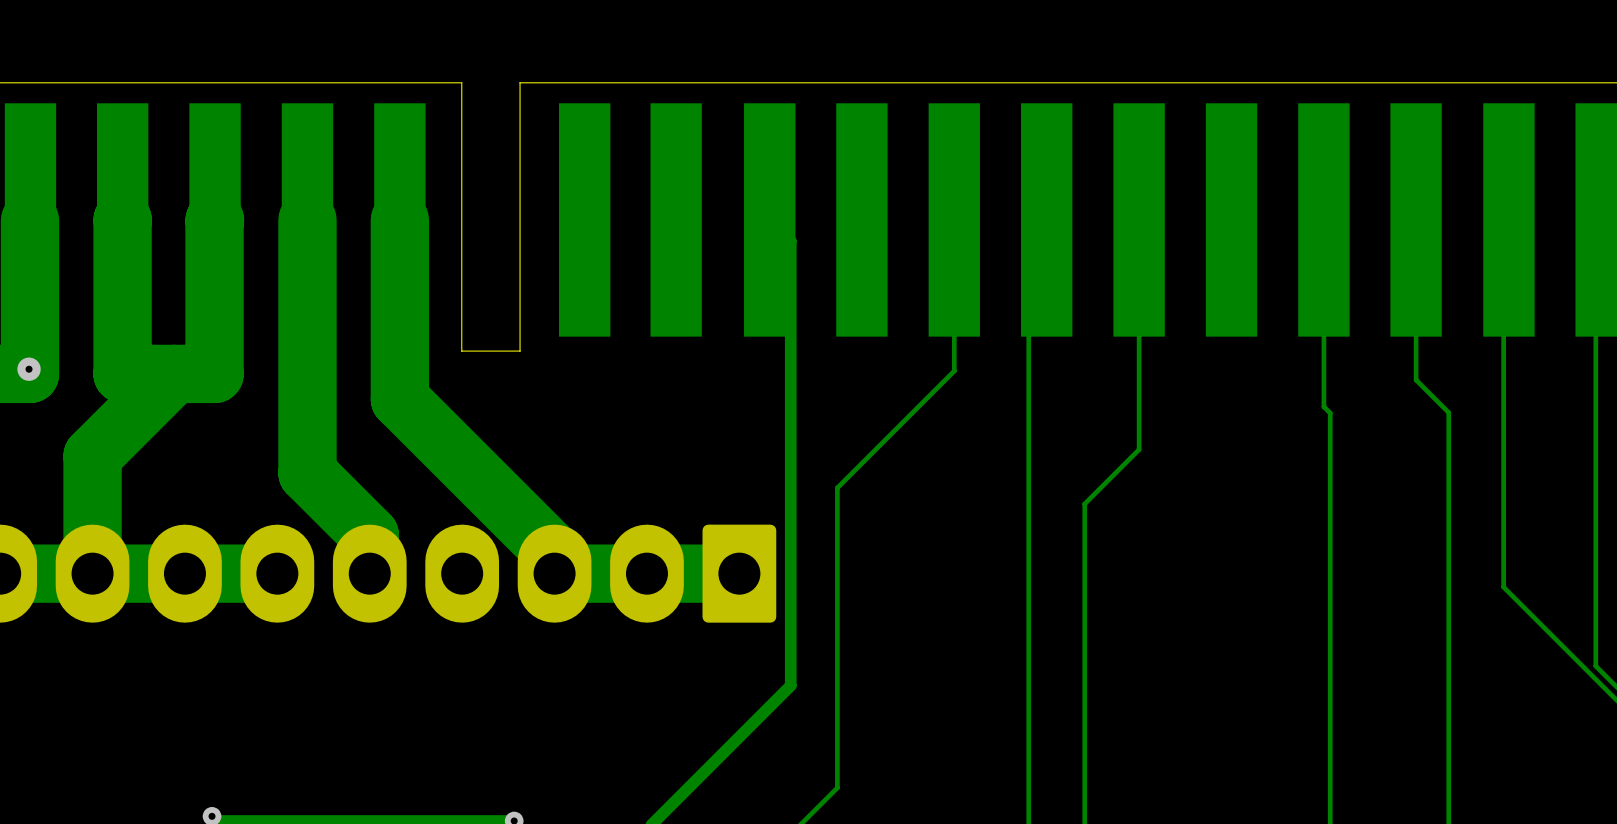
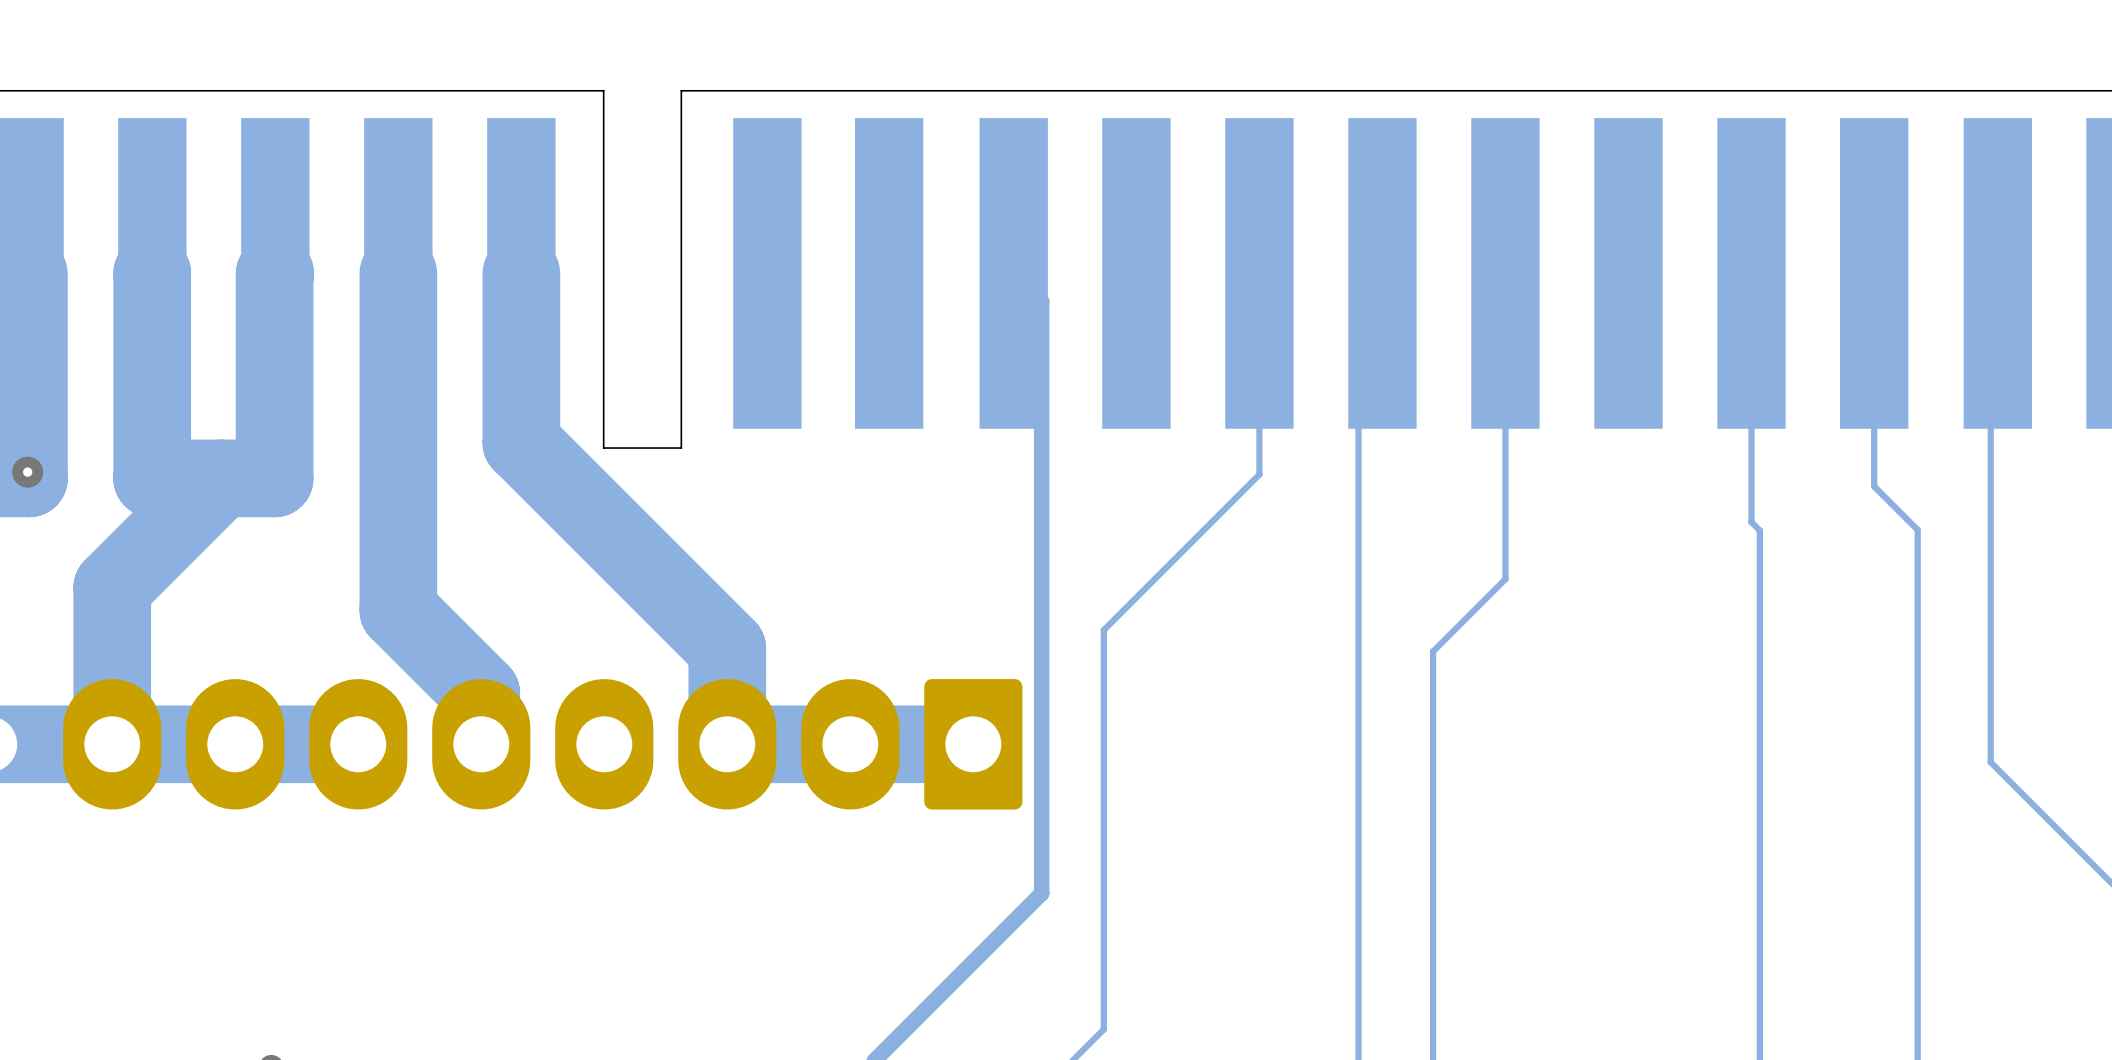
track: (399, 347) (399, 399) (554, 553) -> (521, 442) (727, 648) (727, 718)

